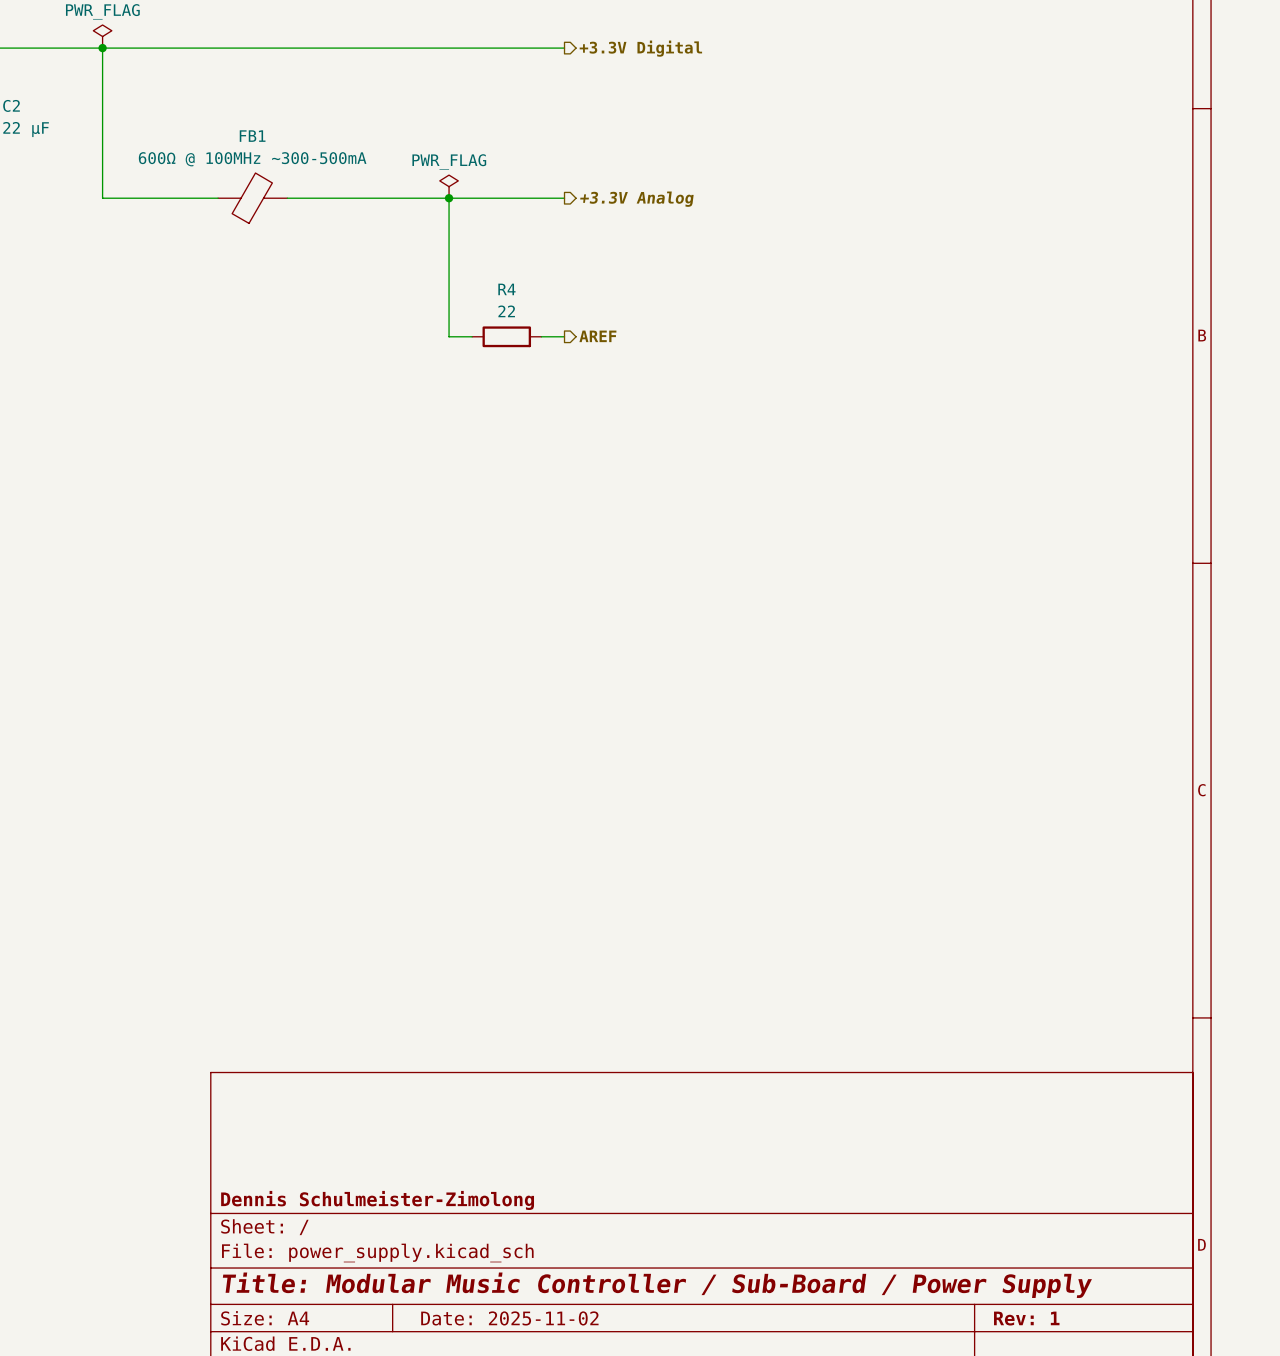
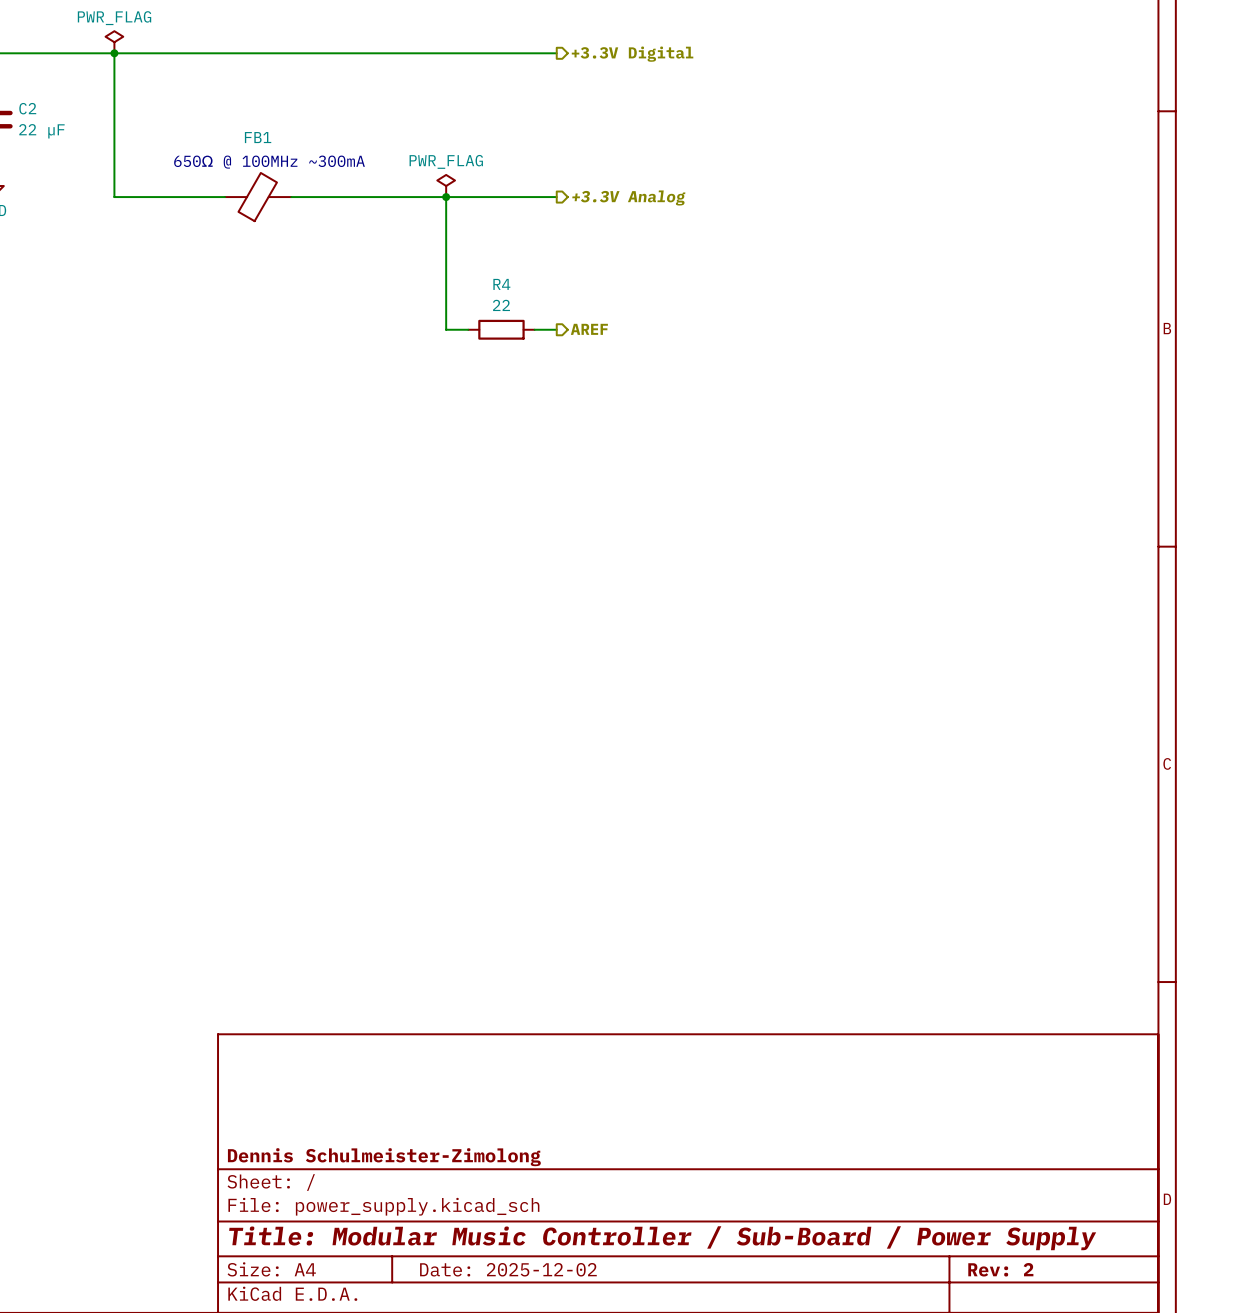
FB1 value: 600Ω @ 100MHz ~300-500mA (252, 159) -> none
text: none -> 650Ω @ 100MHz ~300mA (269, 162)
title block: Date: 2025-11-02 (509, 1318) -> Date: 2025-12-02 (508, 1269)
title block: Rev: 1 (1026, 1318) -> Rev: 2 (1000, 1269)

